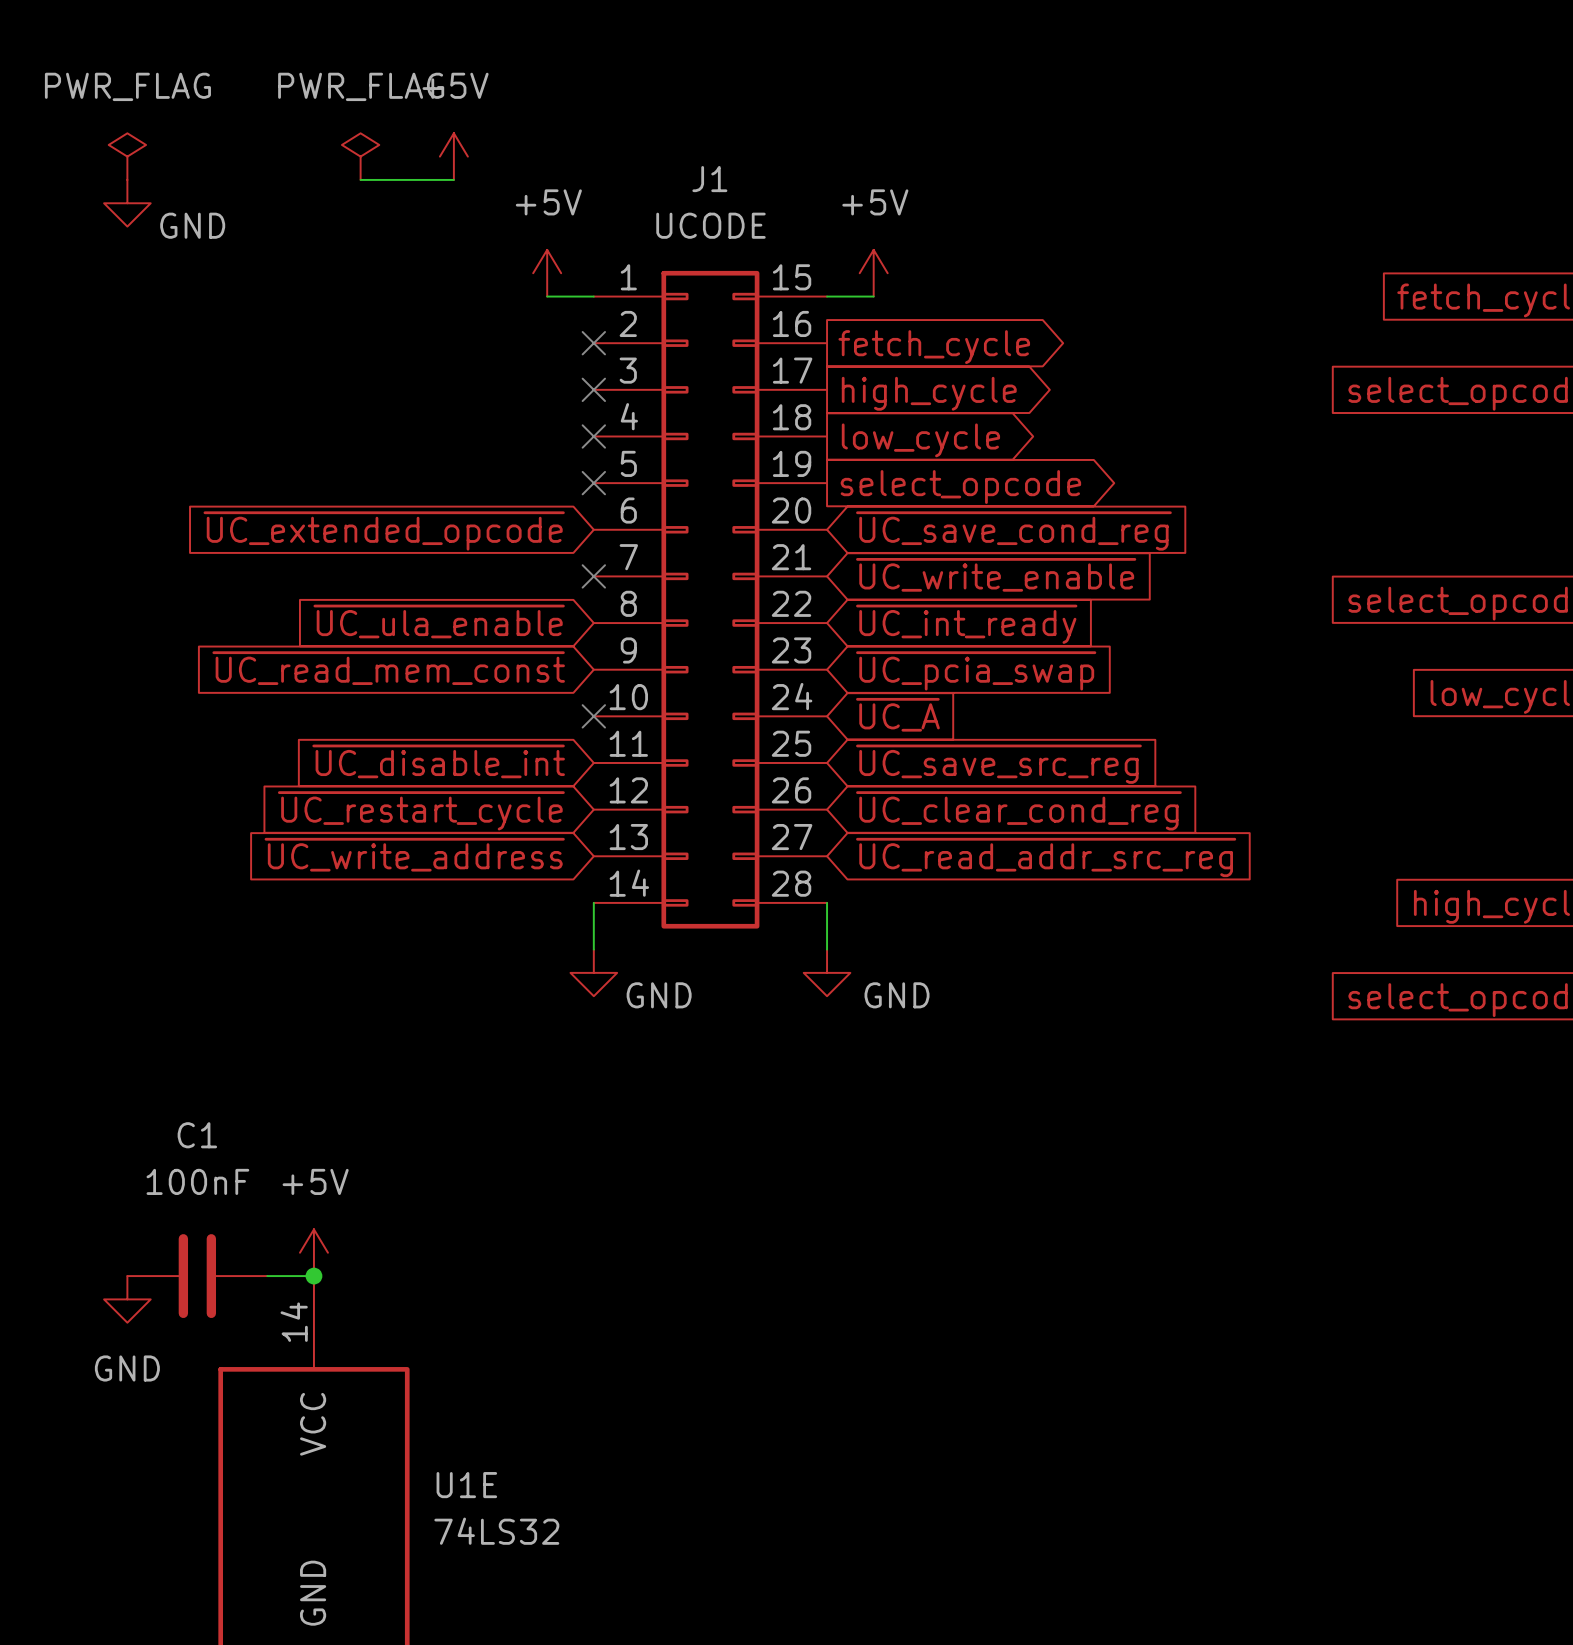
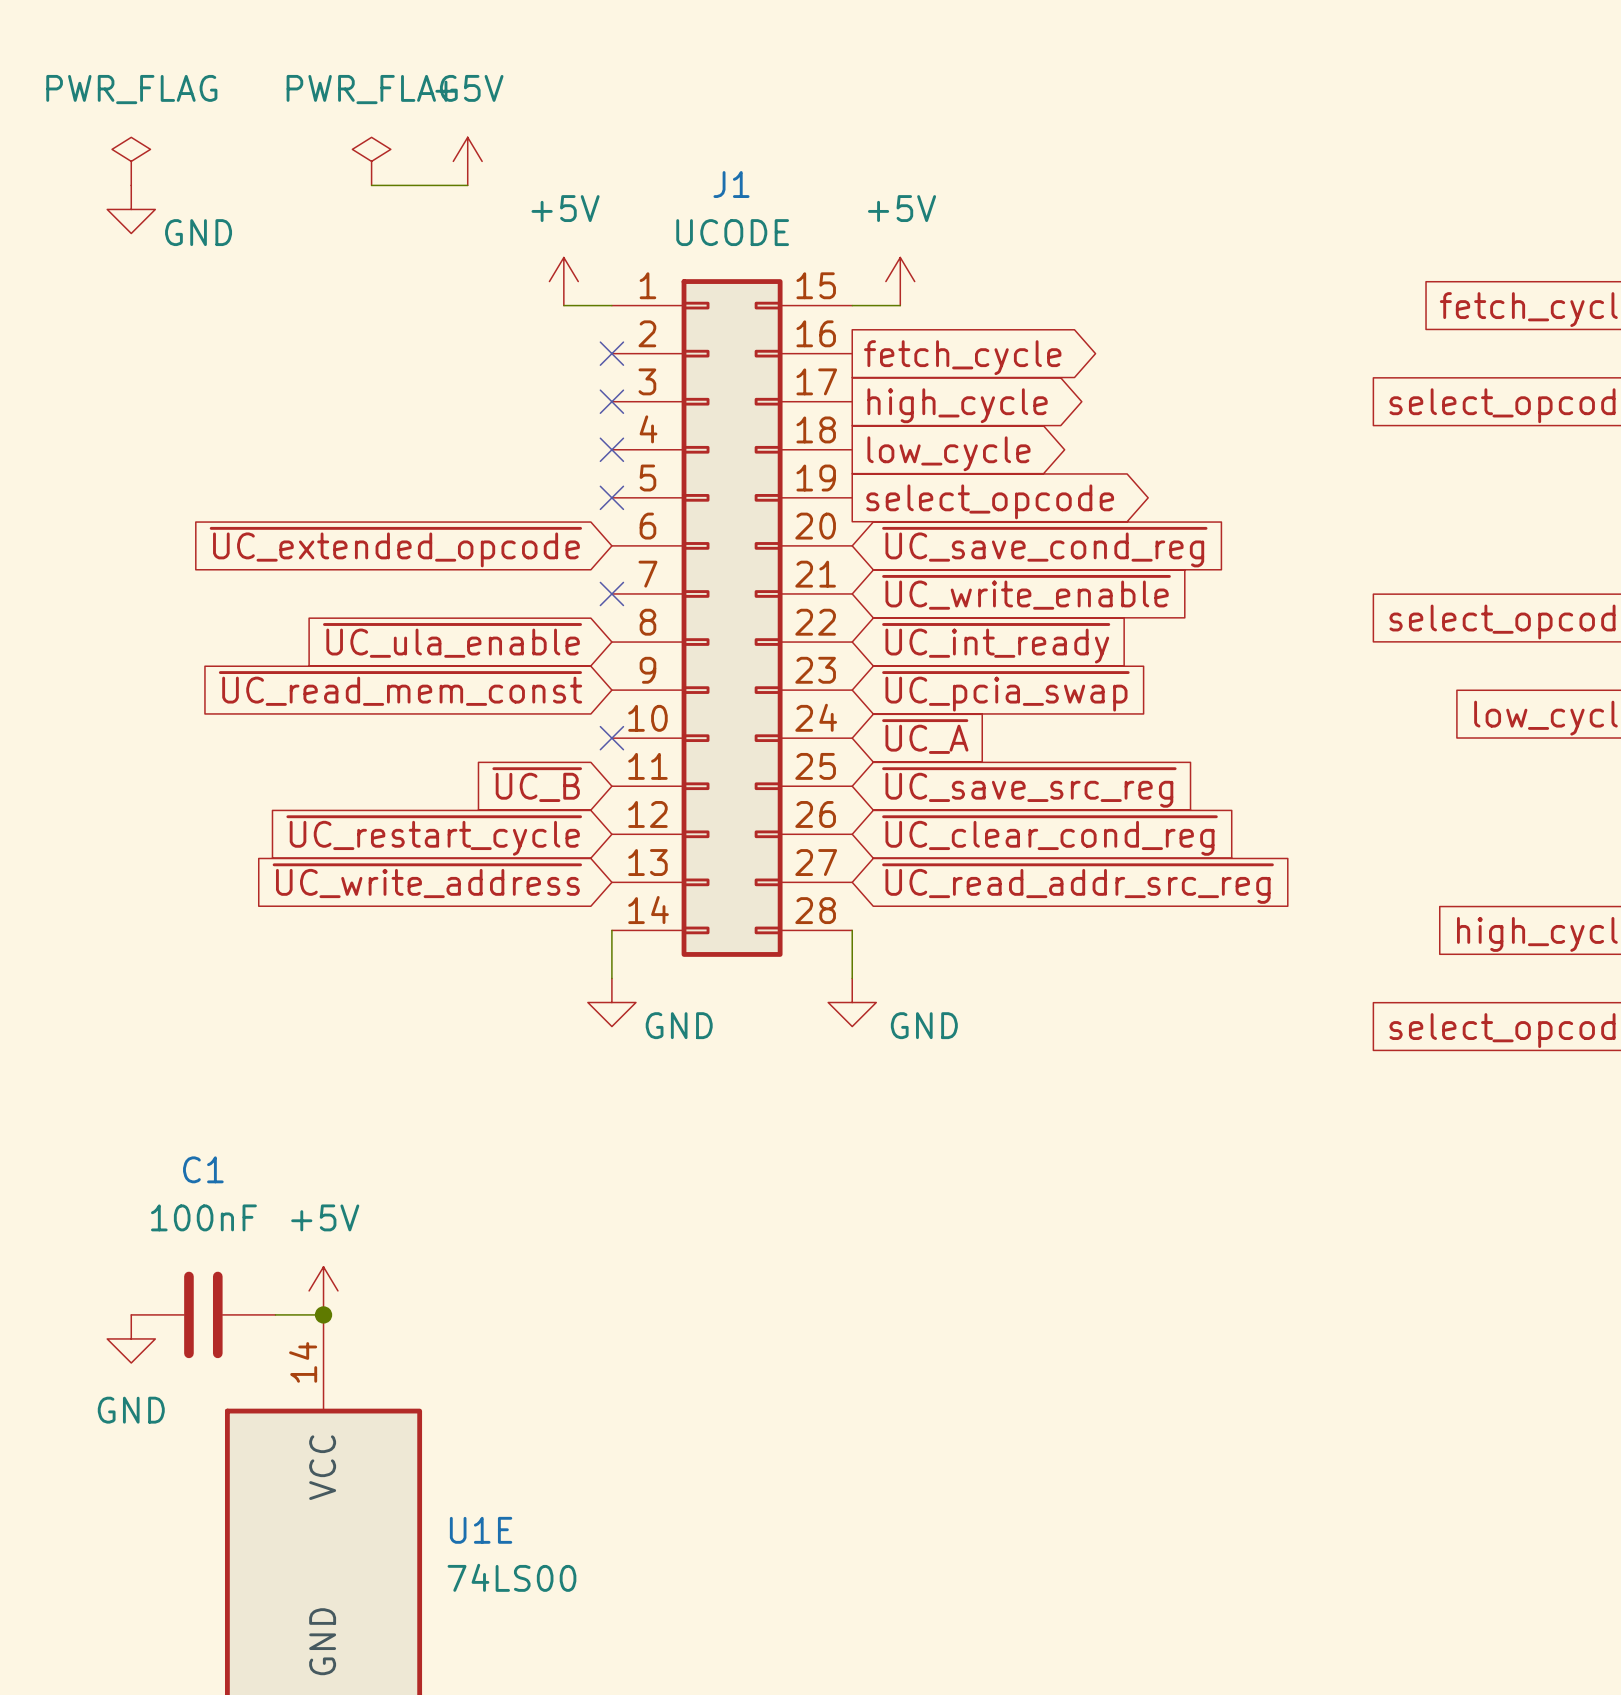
global label: ~{UC_disable_int} (438, 761) -> ~{UC_B} (537, 784)
U1E value: 74LS32 (496, 1531) -> 74LS00 (511, 1577)

